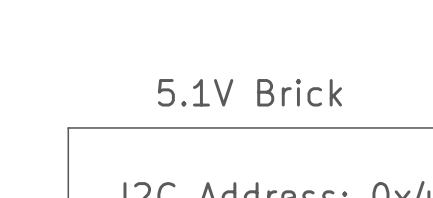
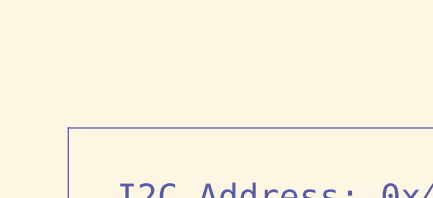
text: 5.1V Brick (249, 92) -> none

